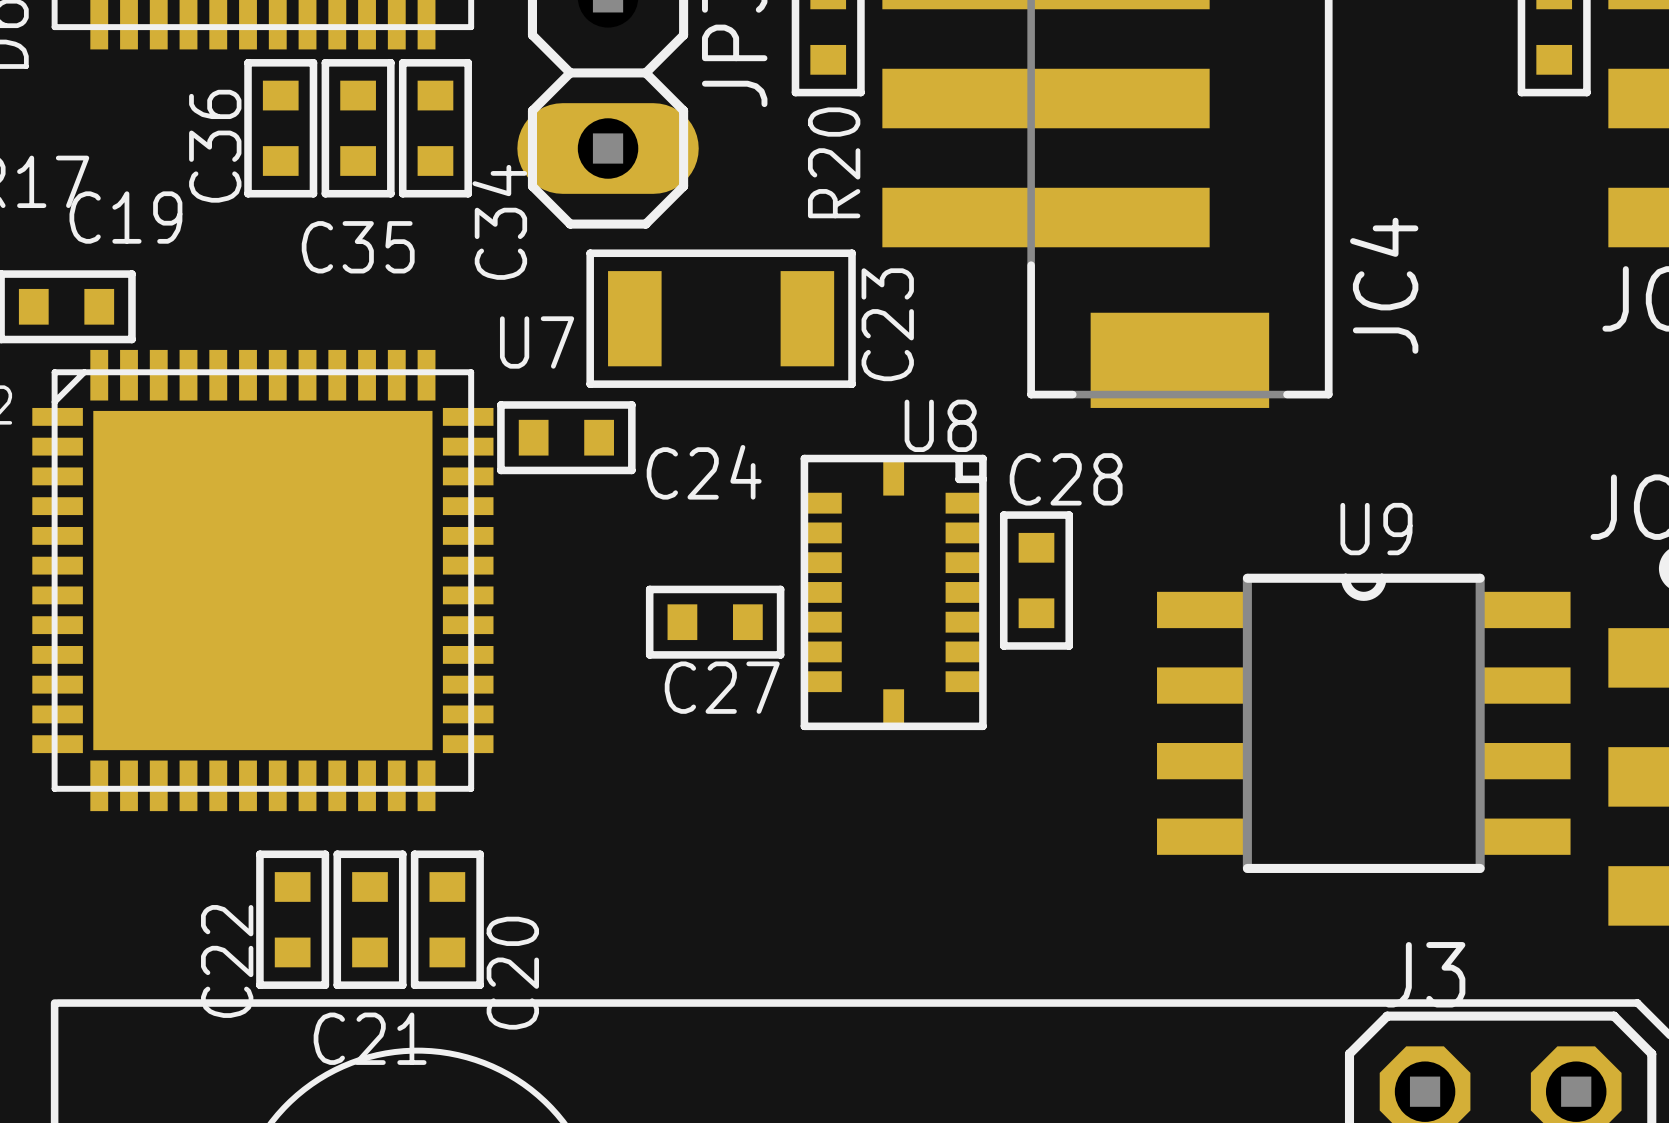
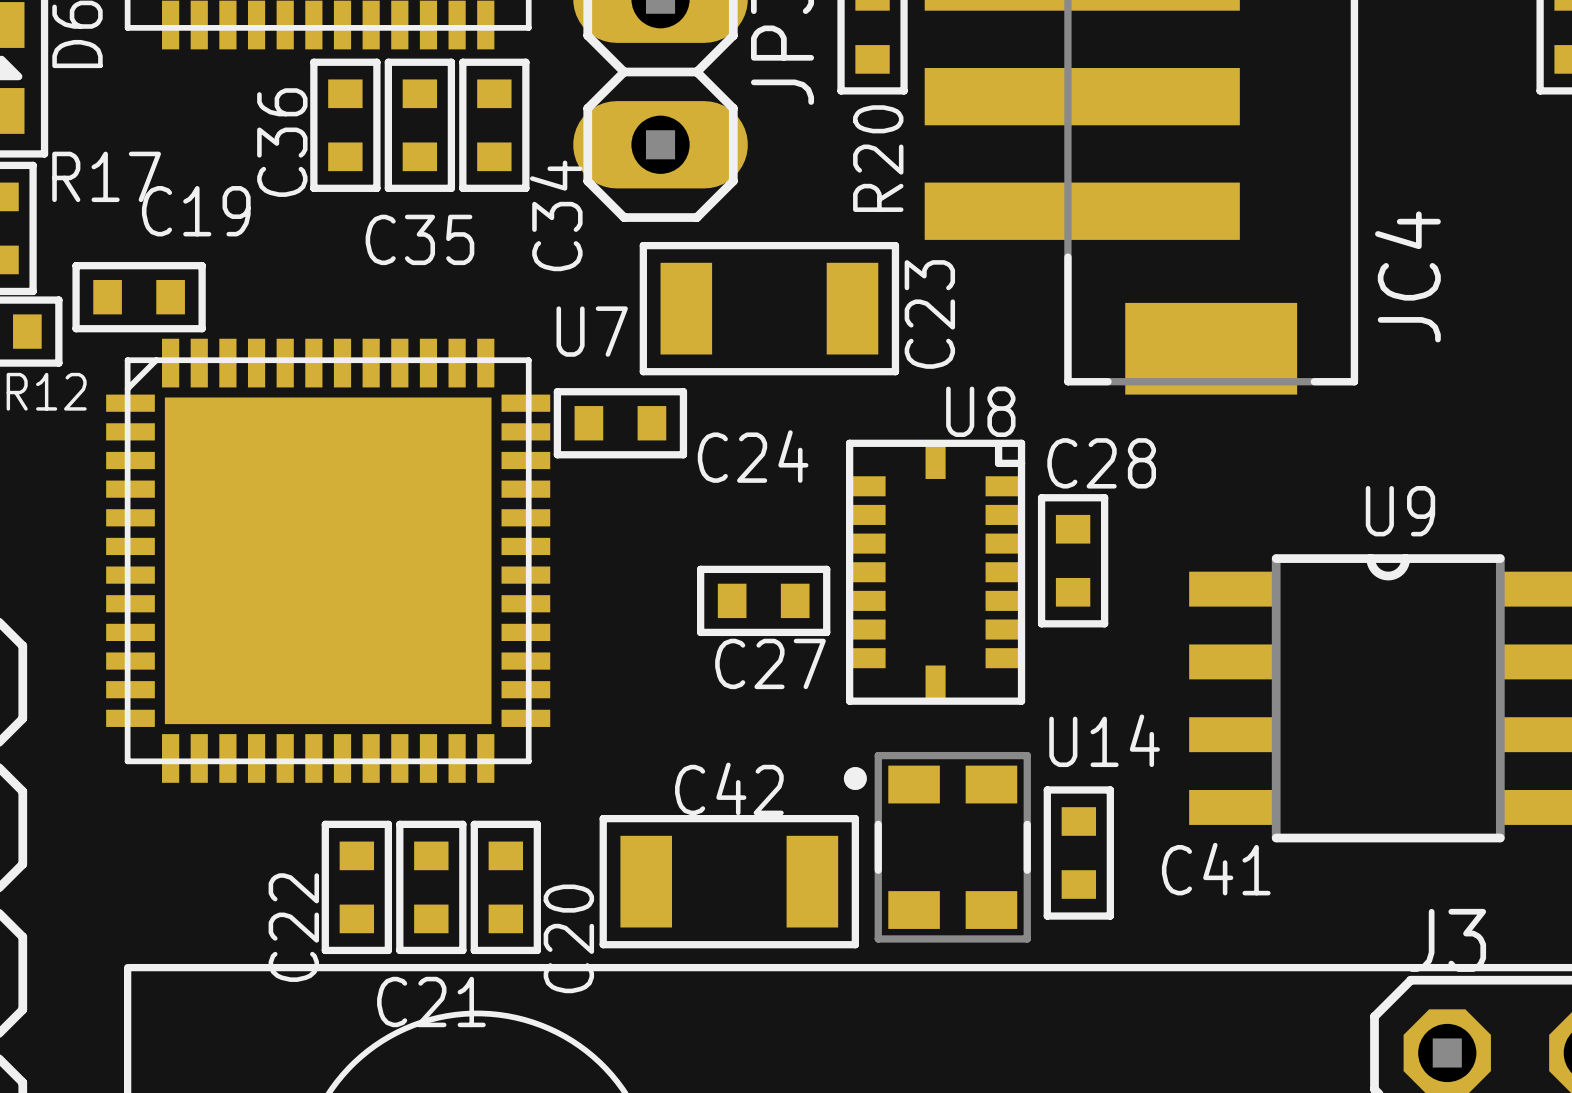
U14: none -> (937, 847)
C41: none -> (1078, 853)
C42: none -> (729, 881)

